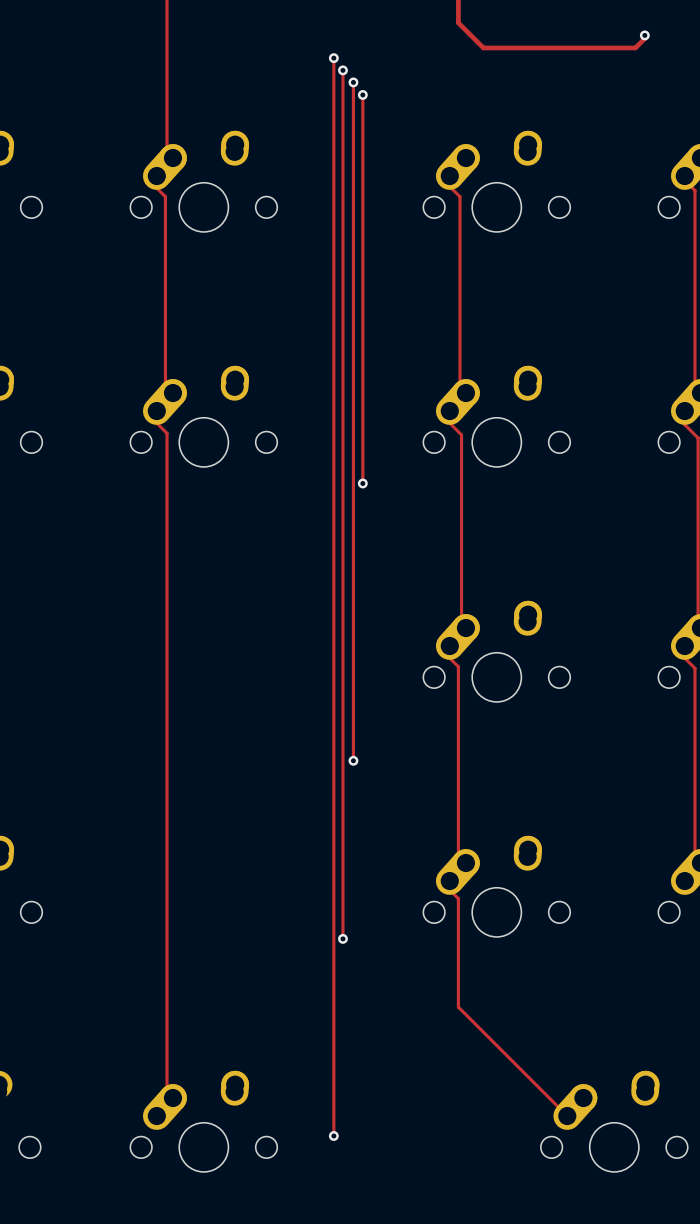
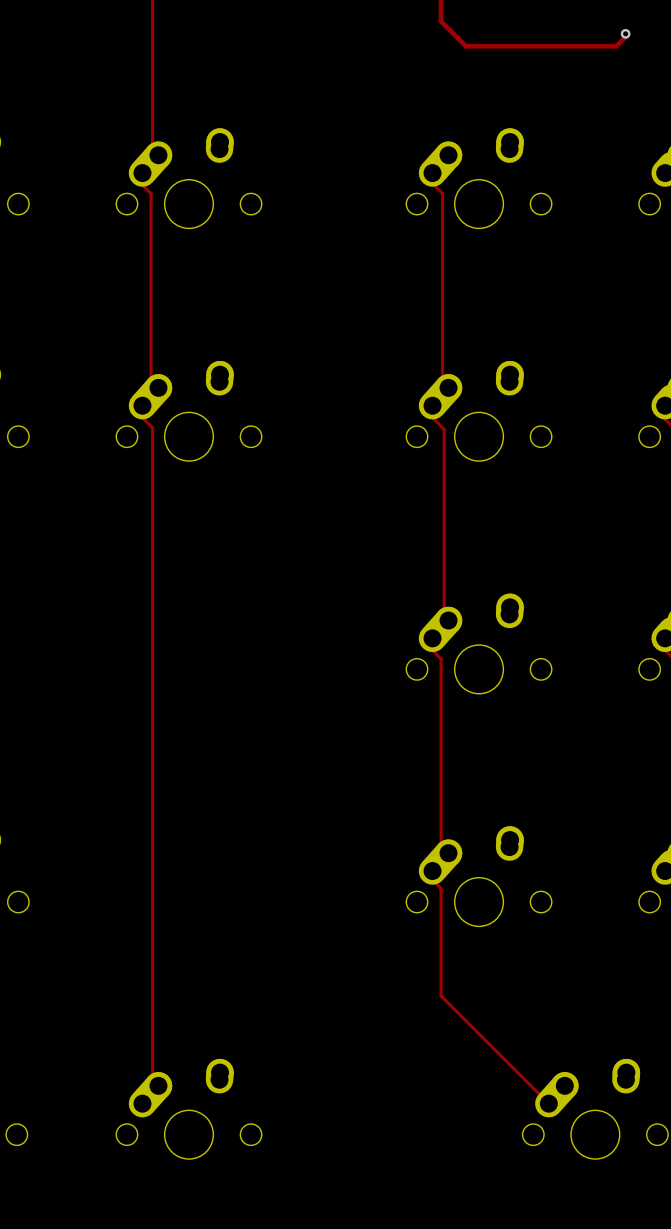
track: (333, 58) (333, 1136) -> none
via: (333, 58) -> none
track: (342, 70) (342, 938) -> none
via: (342, 70) -> none
track: (353, 82) (353, 760) -> none
via: (353, 82) -> none
track: (362, 94) (362, 483) -> none
via: (362, 94) -> none
via: (362, 483) -> none
via: (353, 760) -> none
via: (342, 938) -> none
via: (333, 1136) -> none

